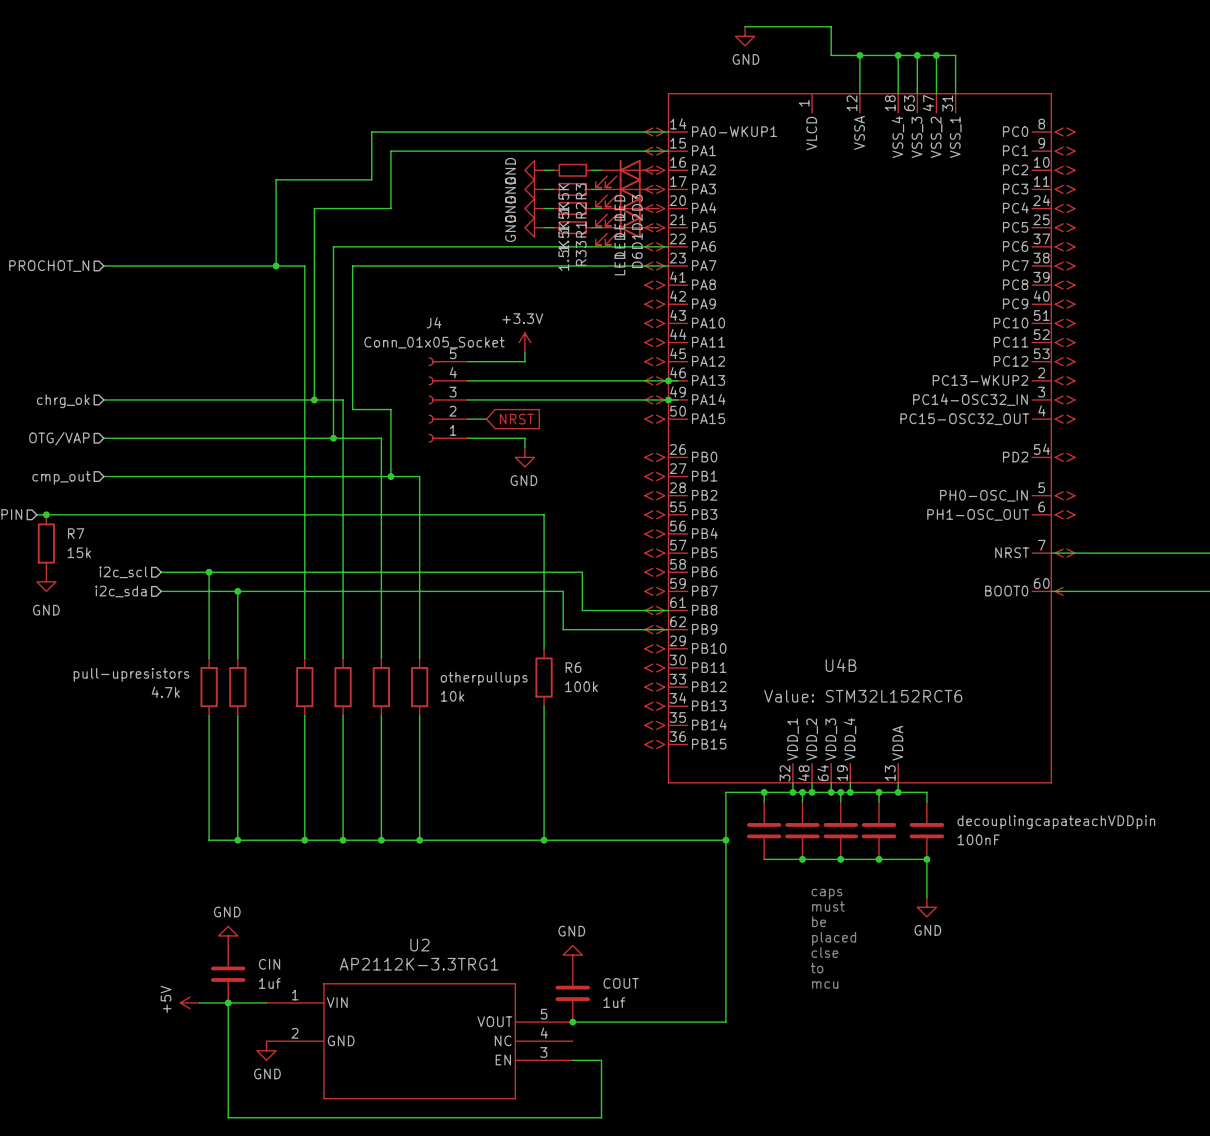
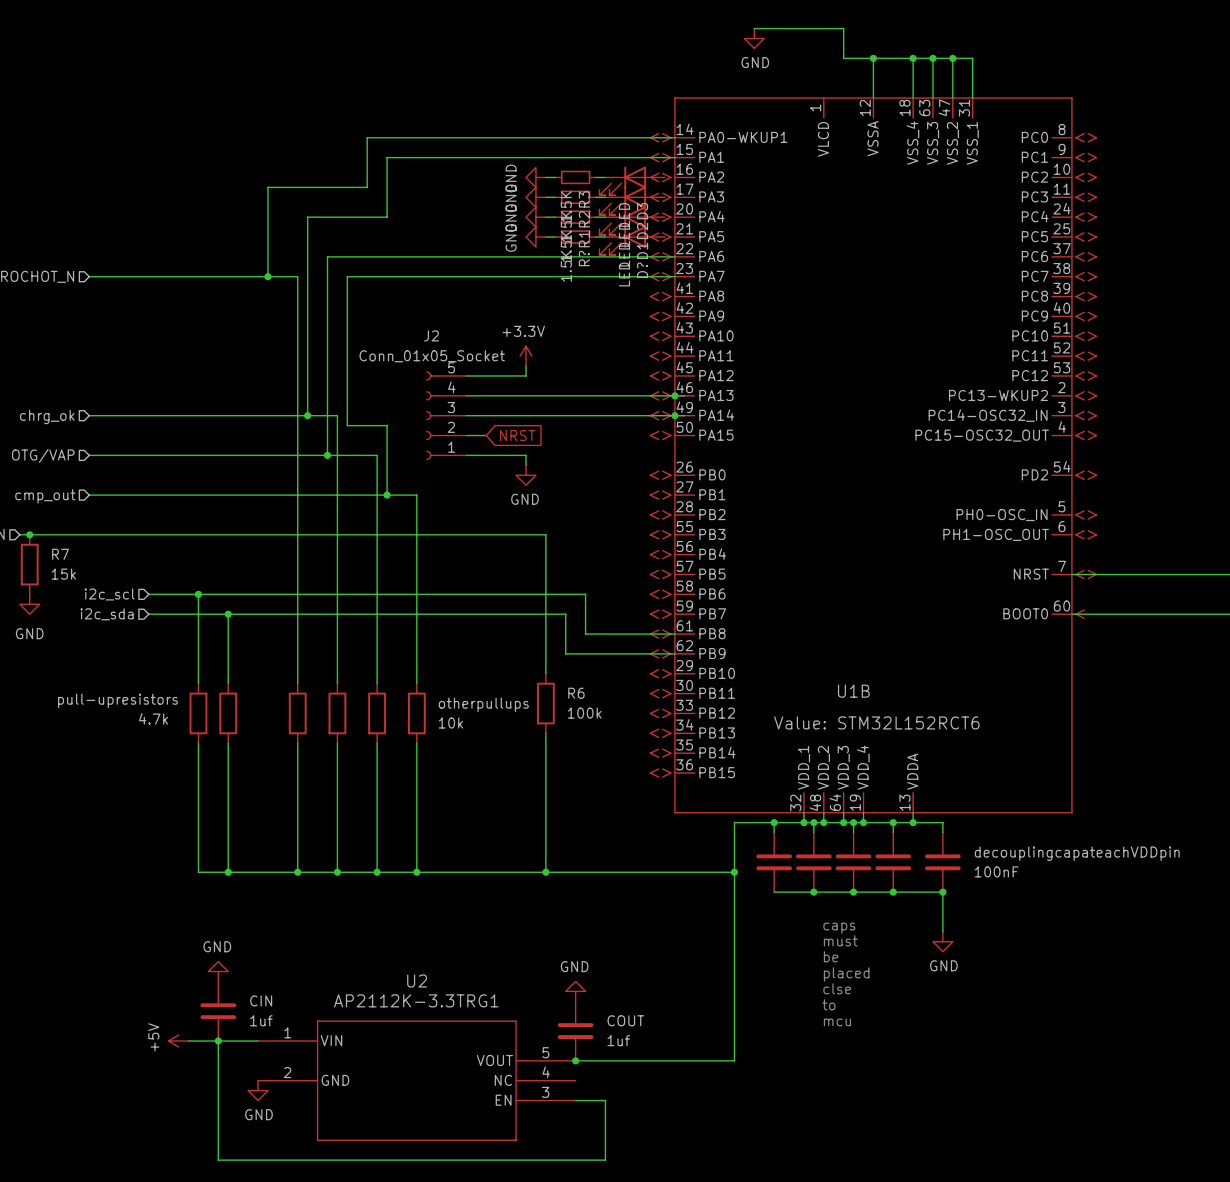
R33 name: R33 (581, 253) -> R? (584, 258)
D6 name: D6 (637, 260) -> D? (642, 270)
J4 name: J4 (434, 322) -> J2 (431, 335)
U4B name: U4B (841, 665) -> U1B (853, 691)

